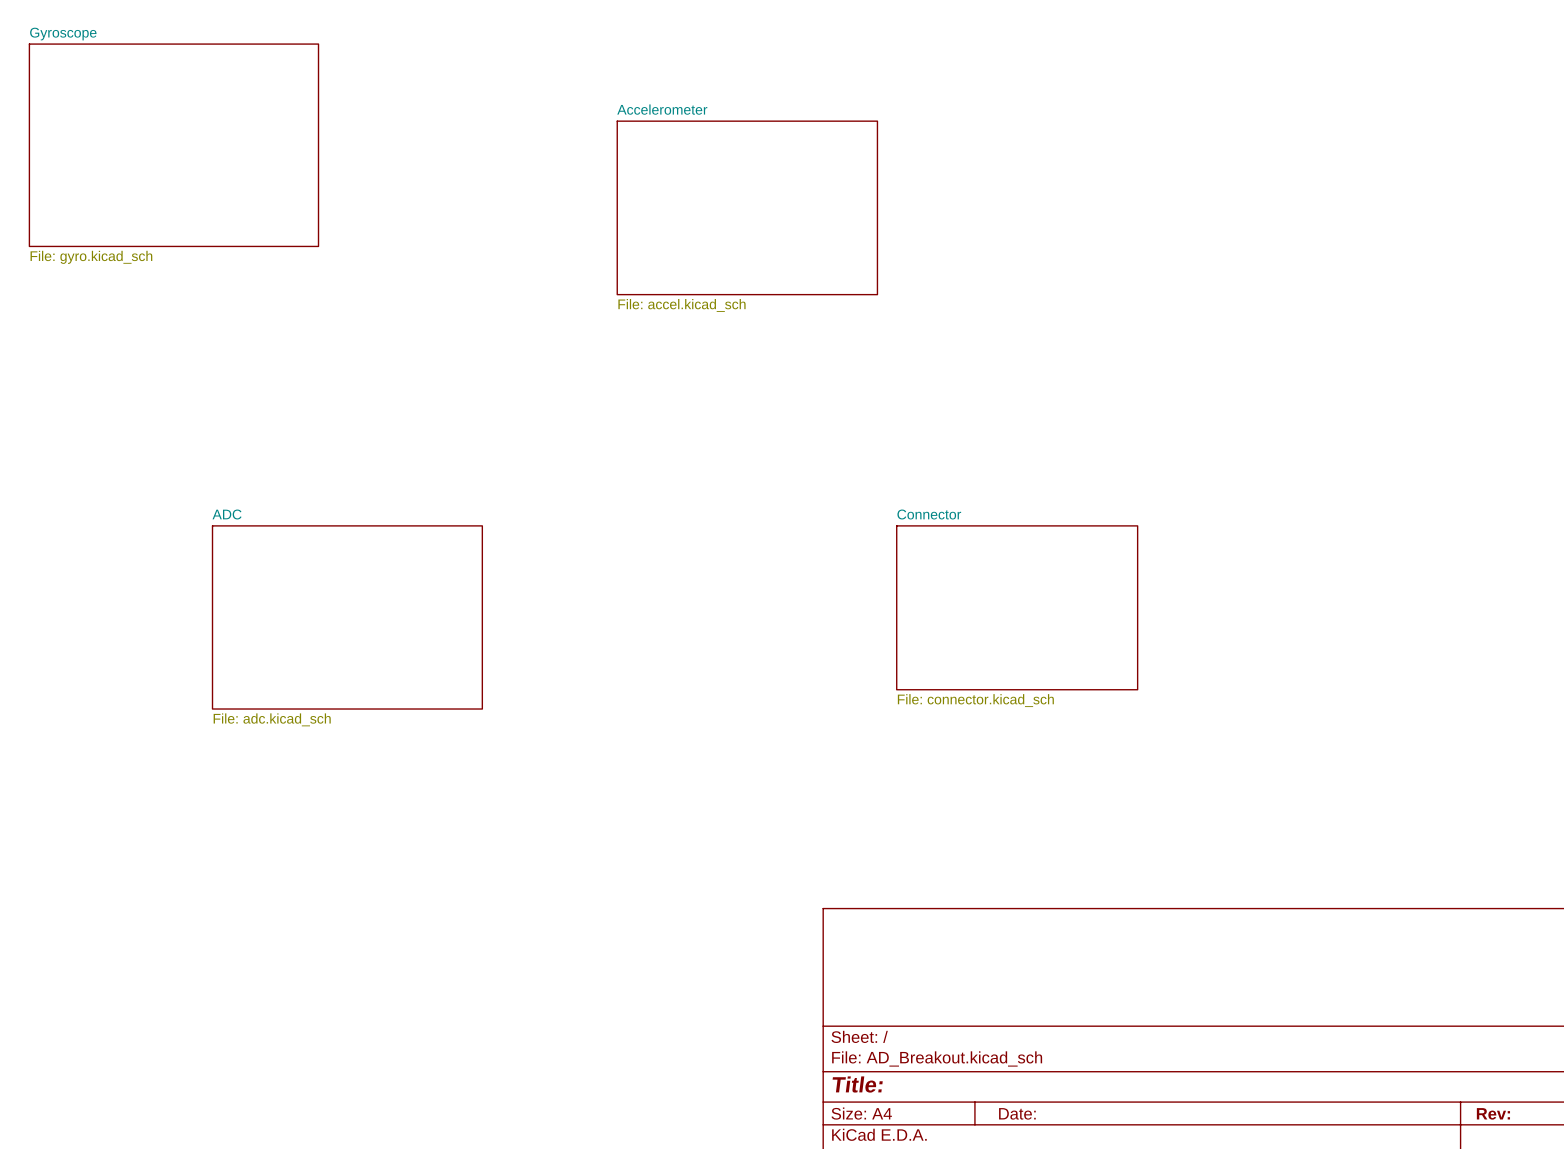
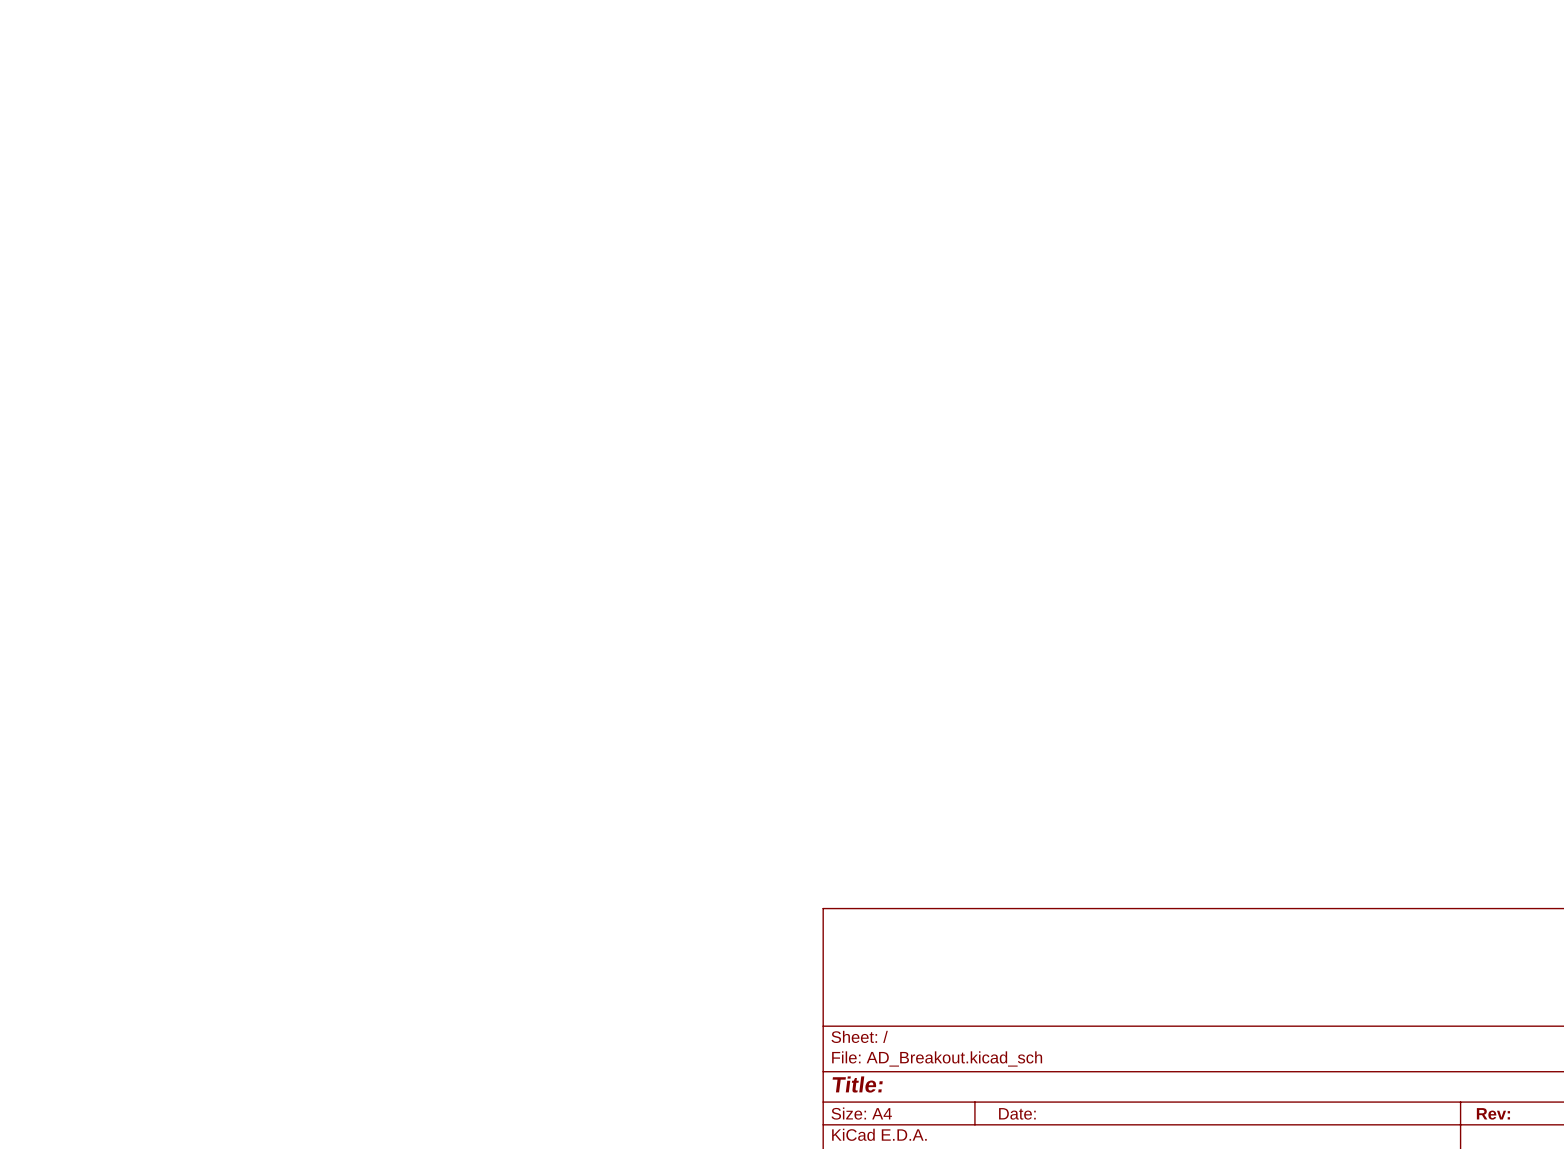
sheet Gyroscope: File: gyro.kicad_sch (173, 145) -> none
sheet Accelerometer: File: accel.kicad_sch (747, 207) -> none
sheet Connector: File: connector.kicad_sch (1017, 607) -> none
sheet ADC: File: adc.kicad_sch (347, 617) -> none

